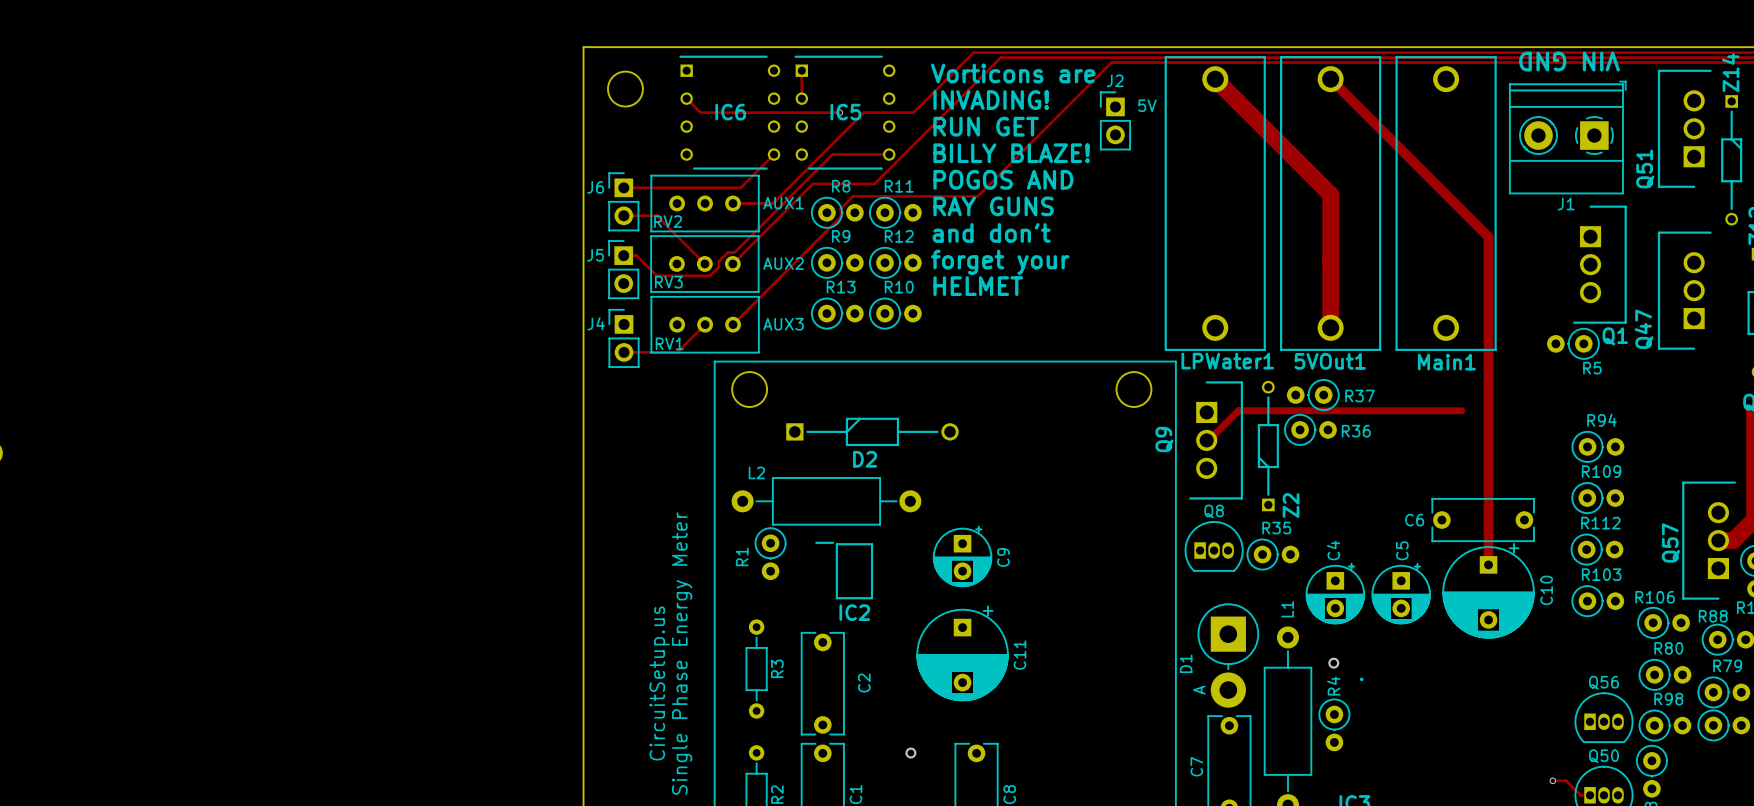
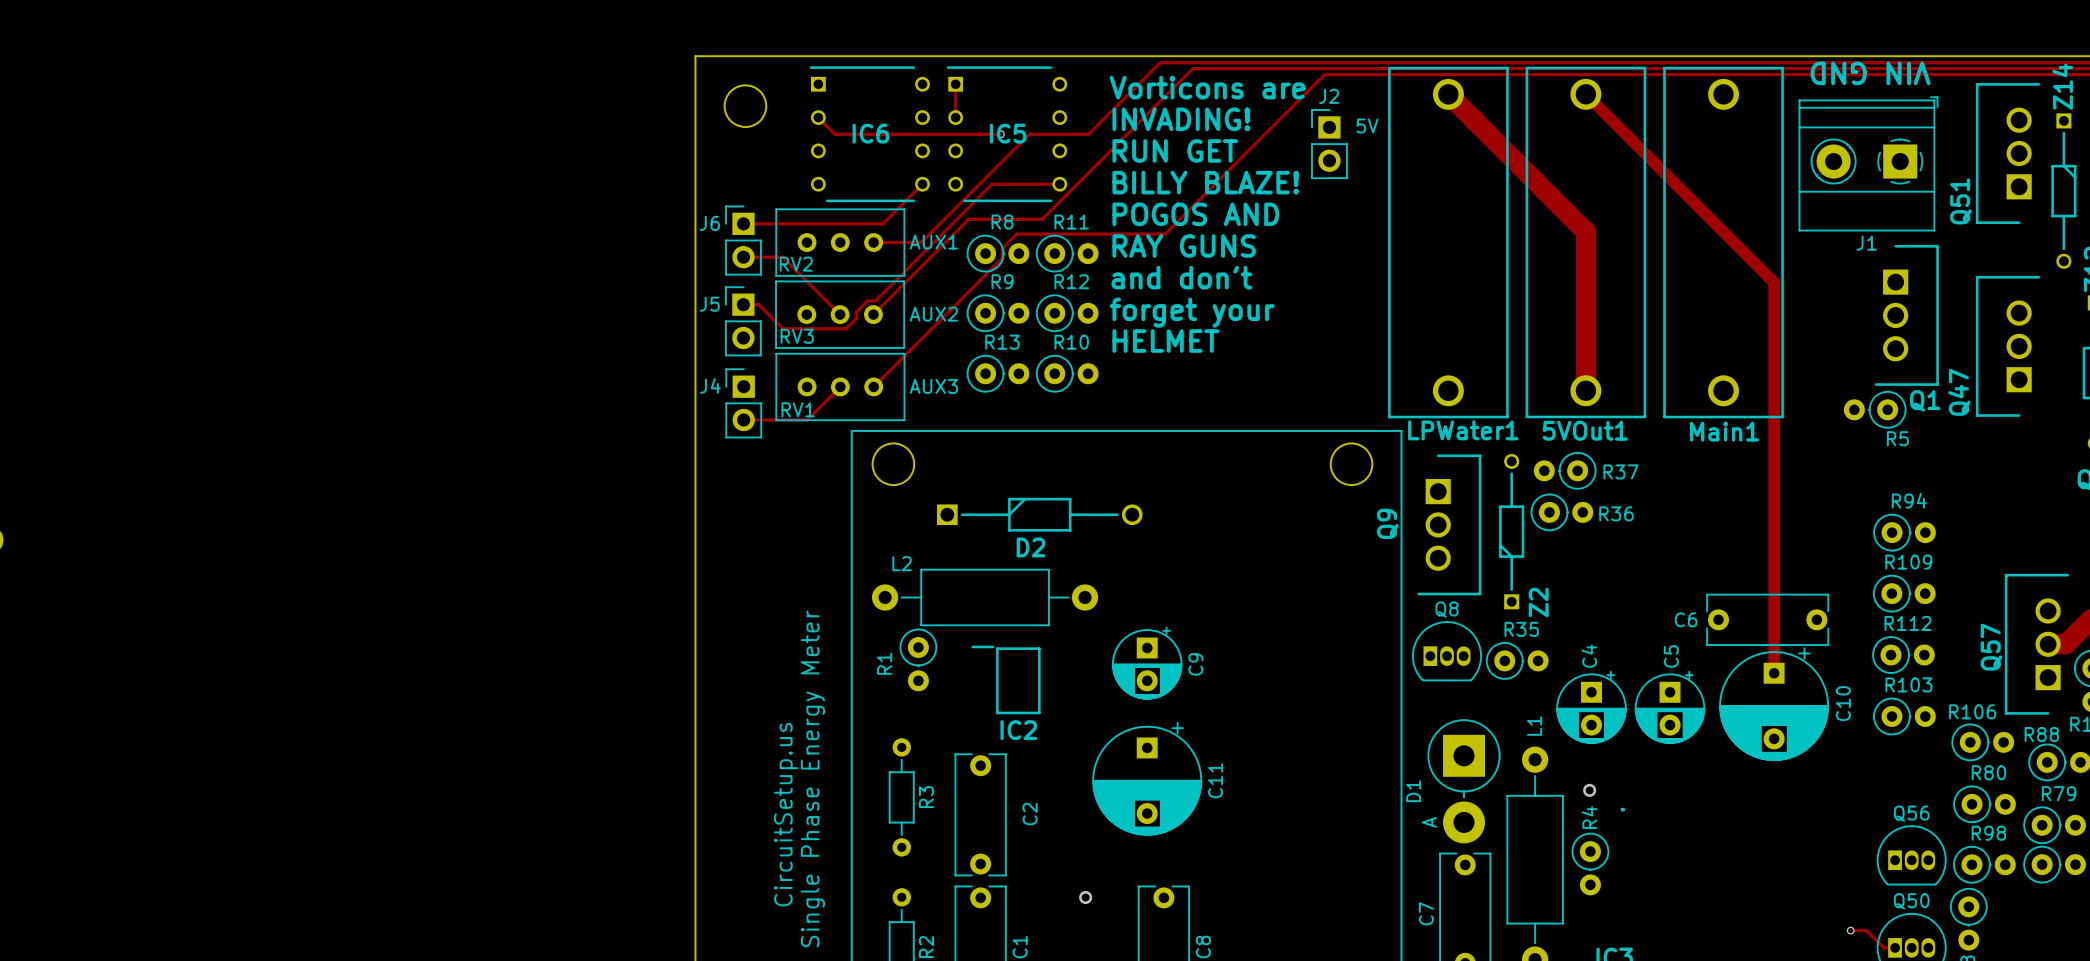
track: (1461, 410) (1238, 410) (1206, 440) -> none

